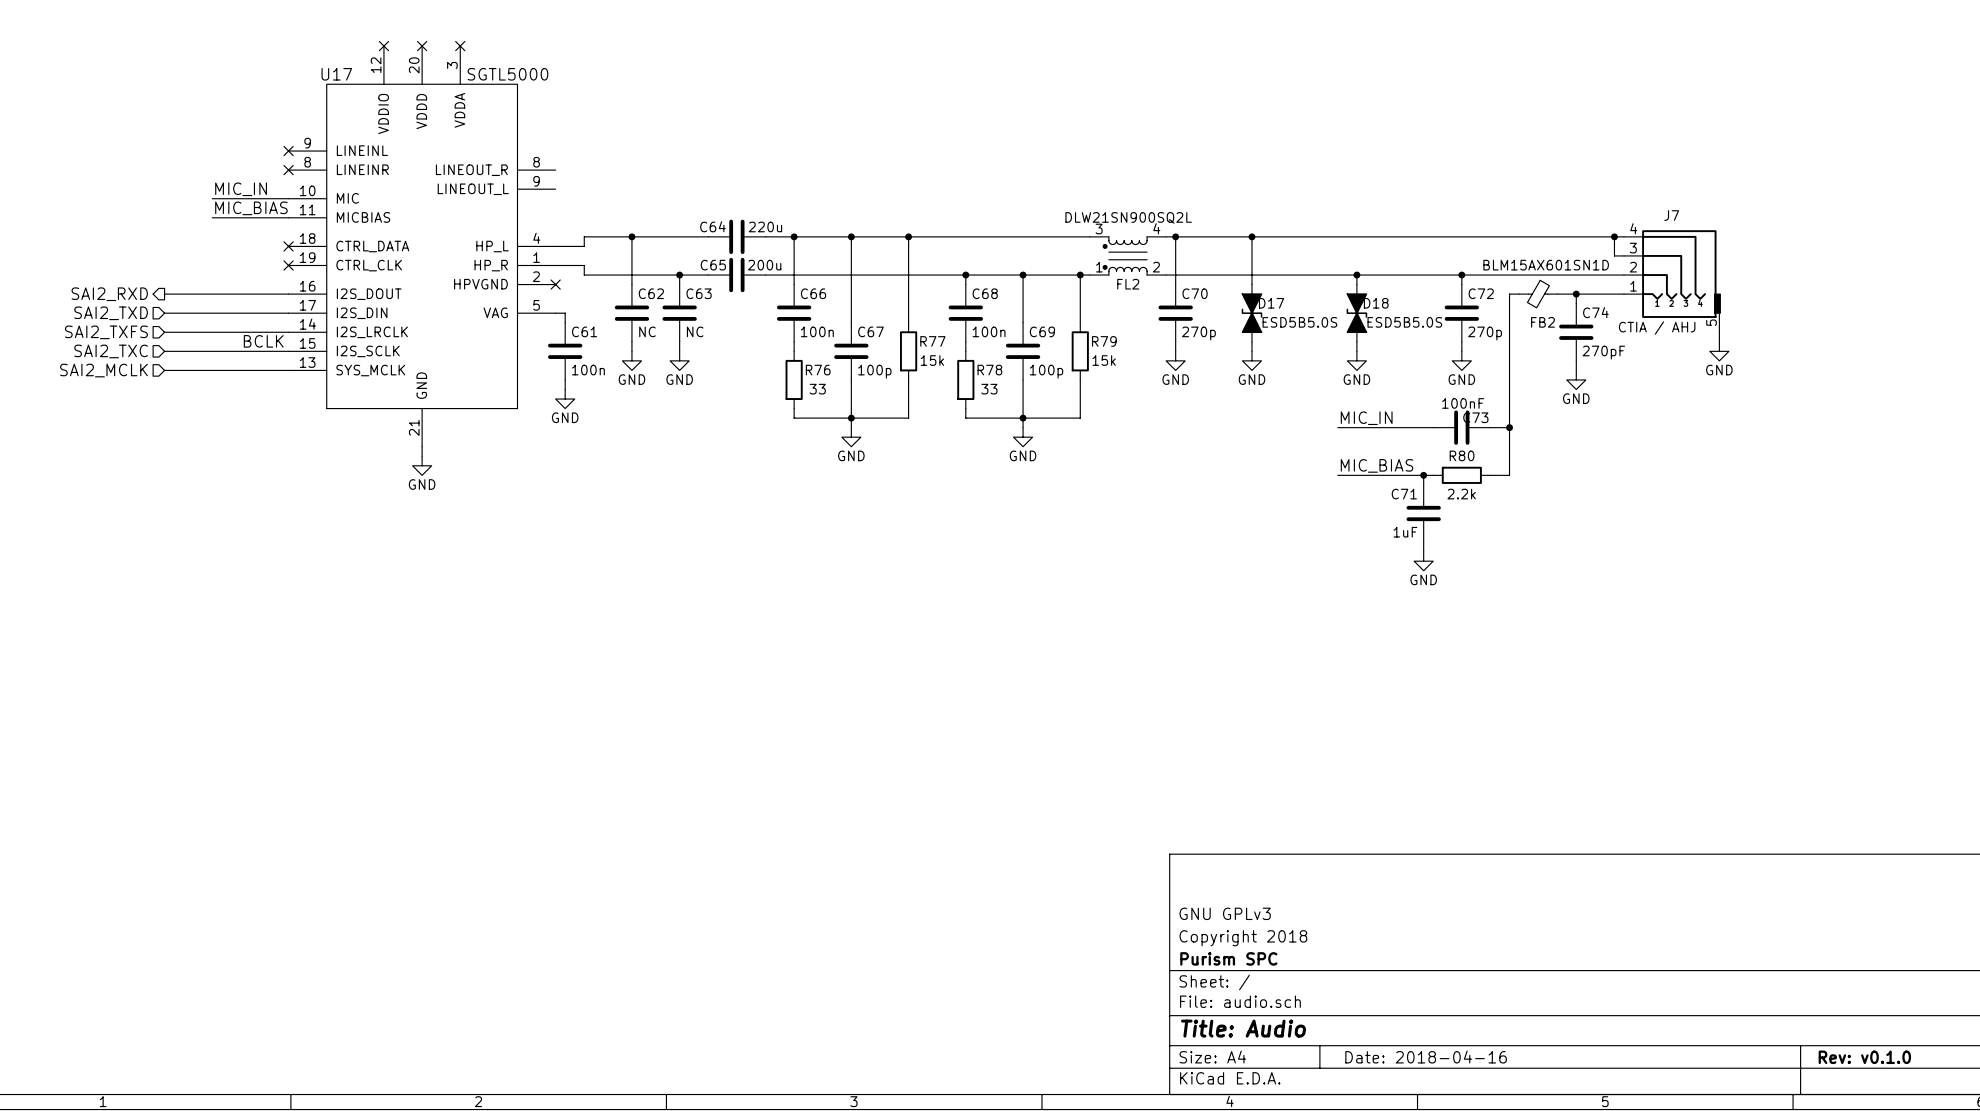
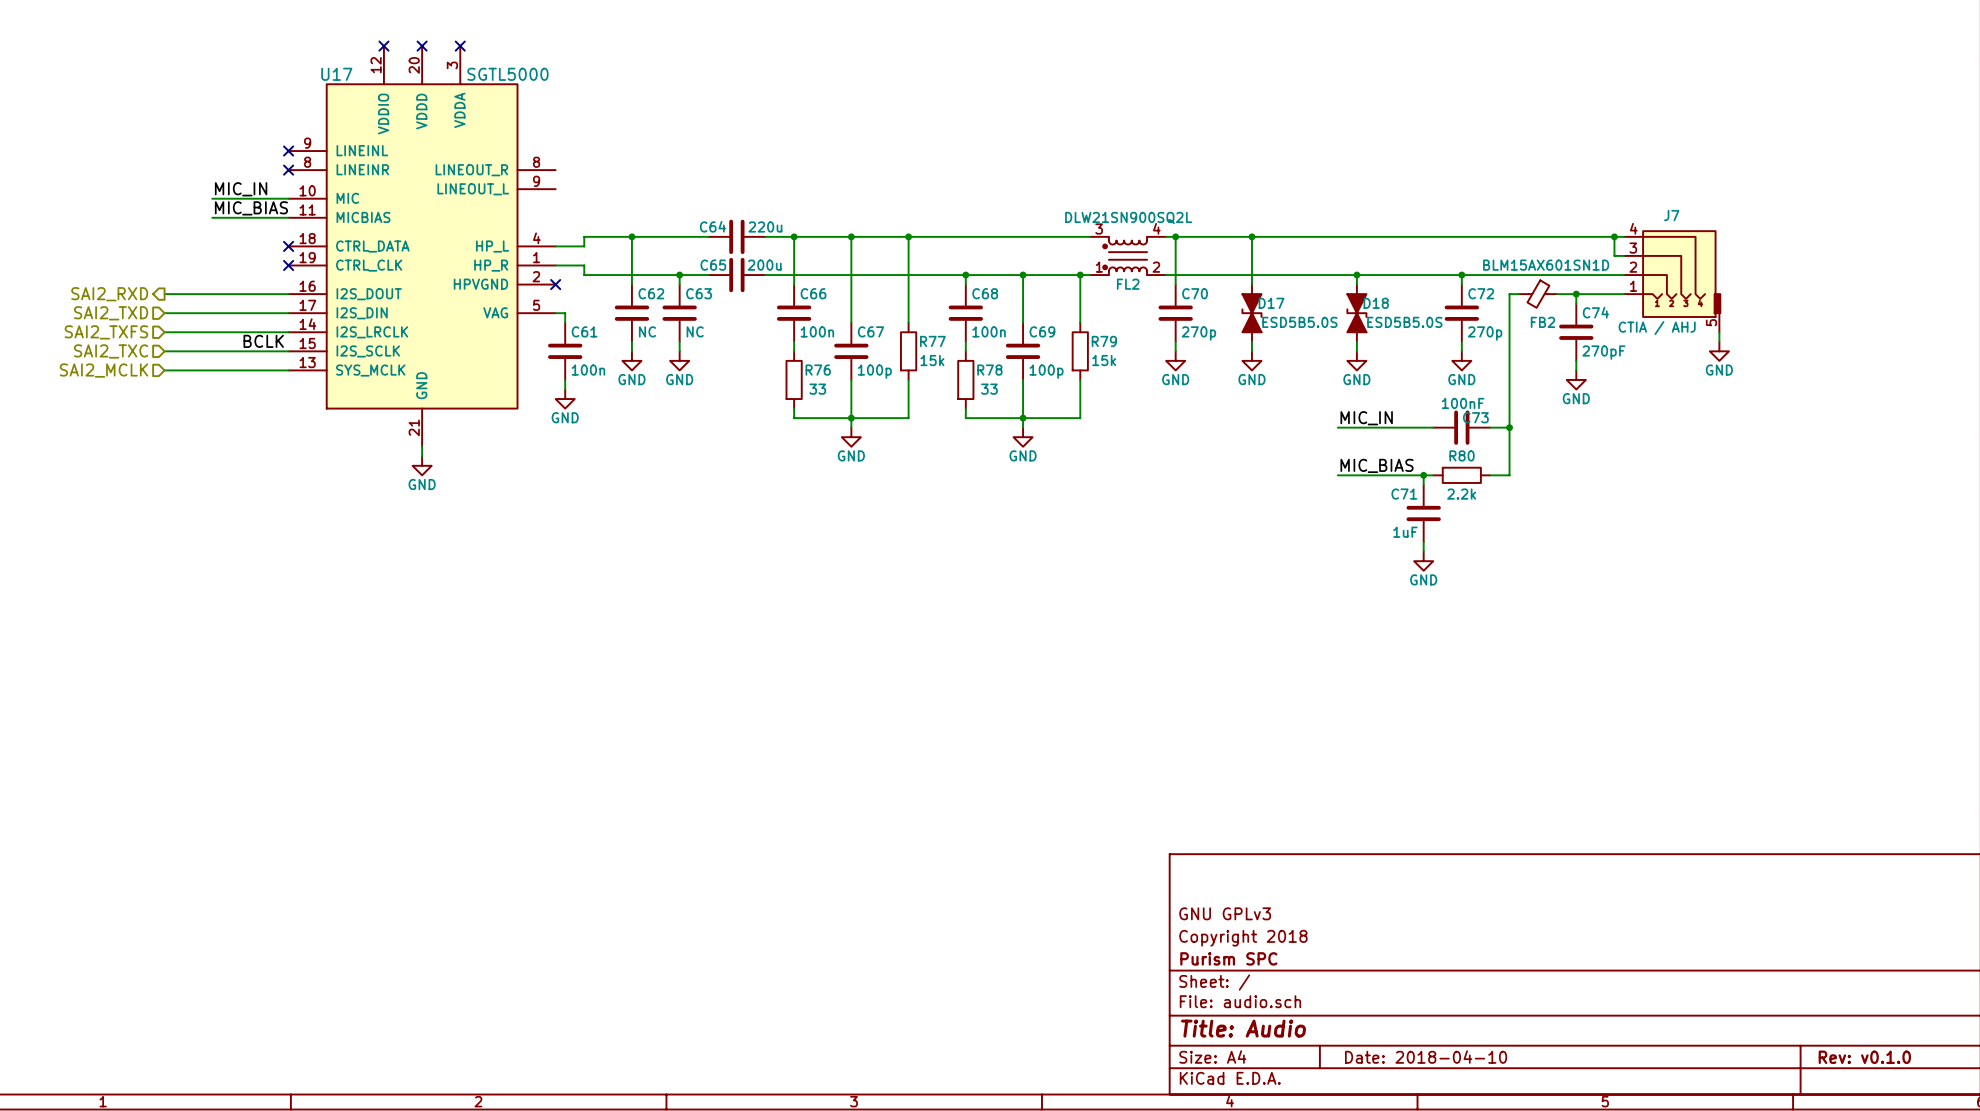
title block: Date: 2018-04-16 (1426, 1057) -> Date: 2018-04-10 (1426, 1057)

